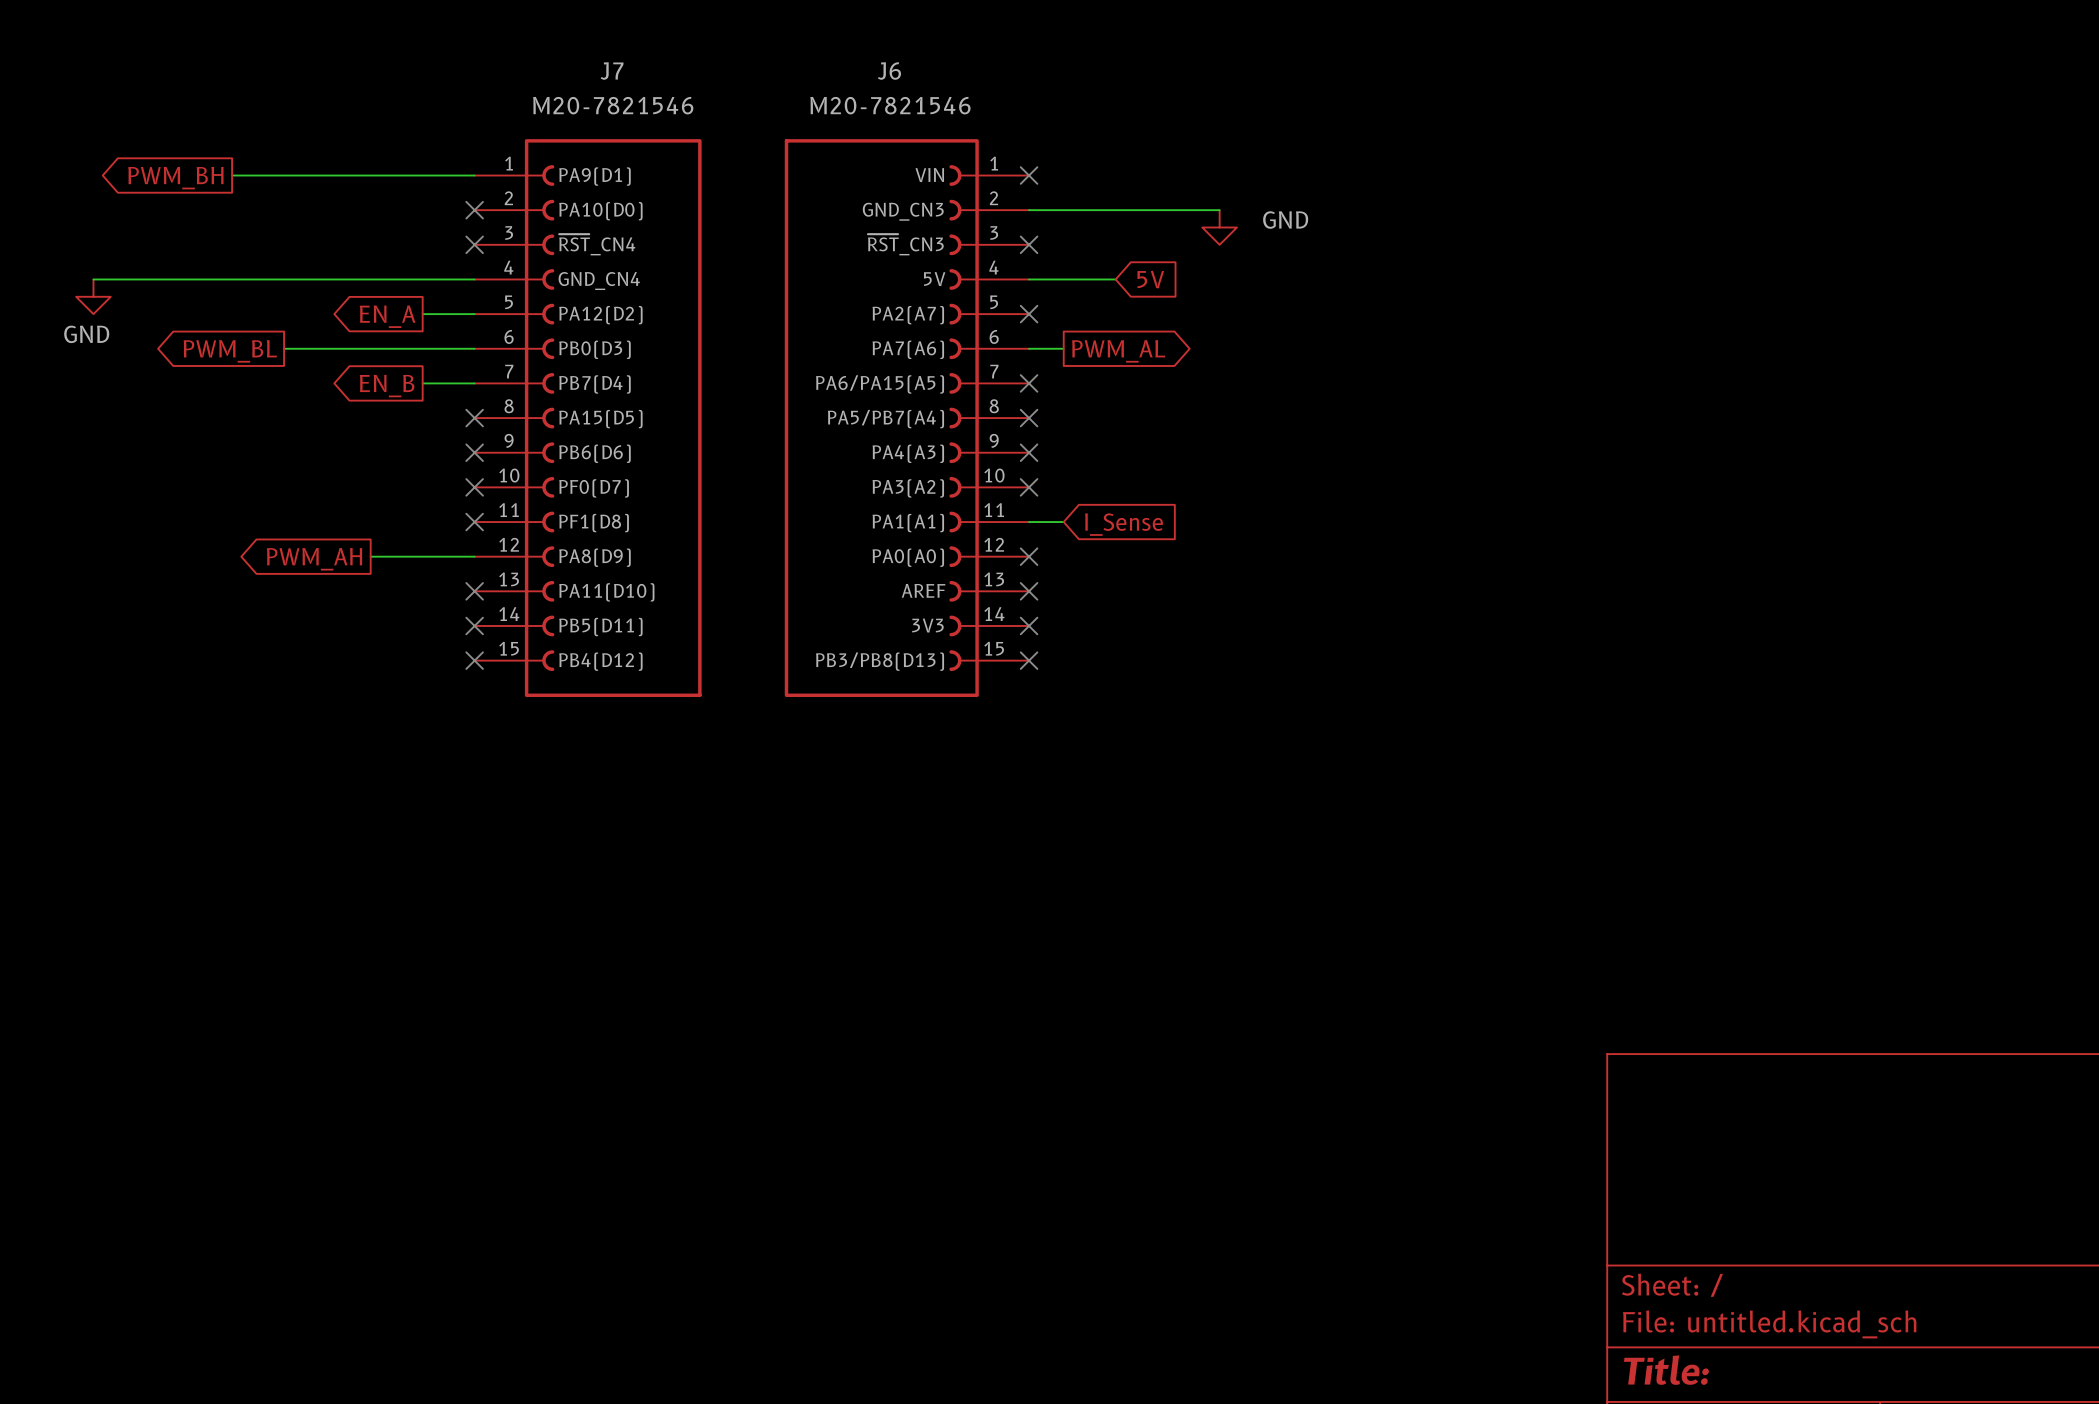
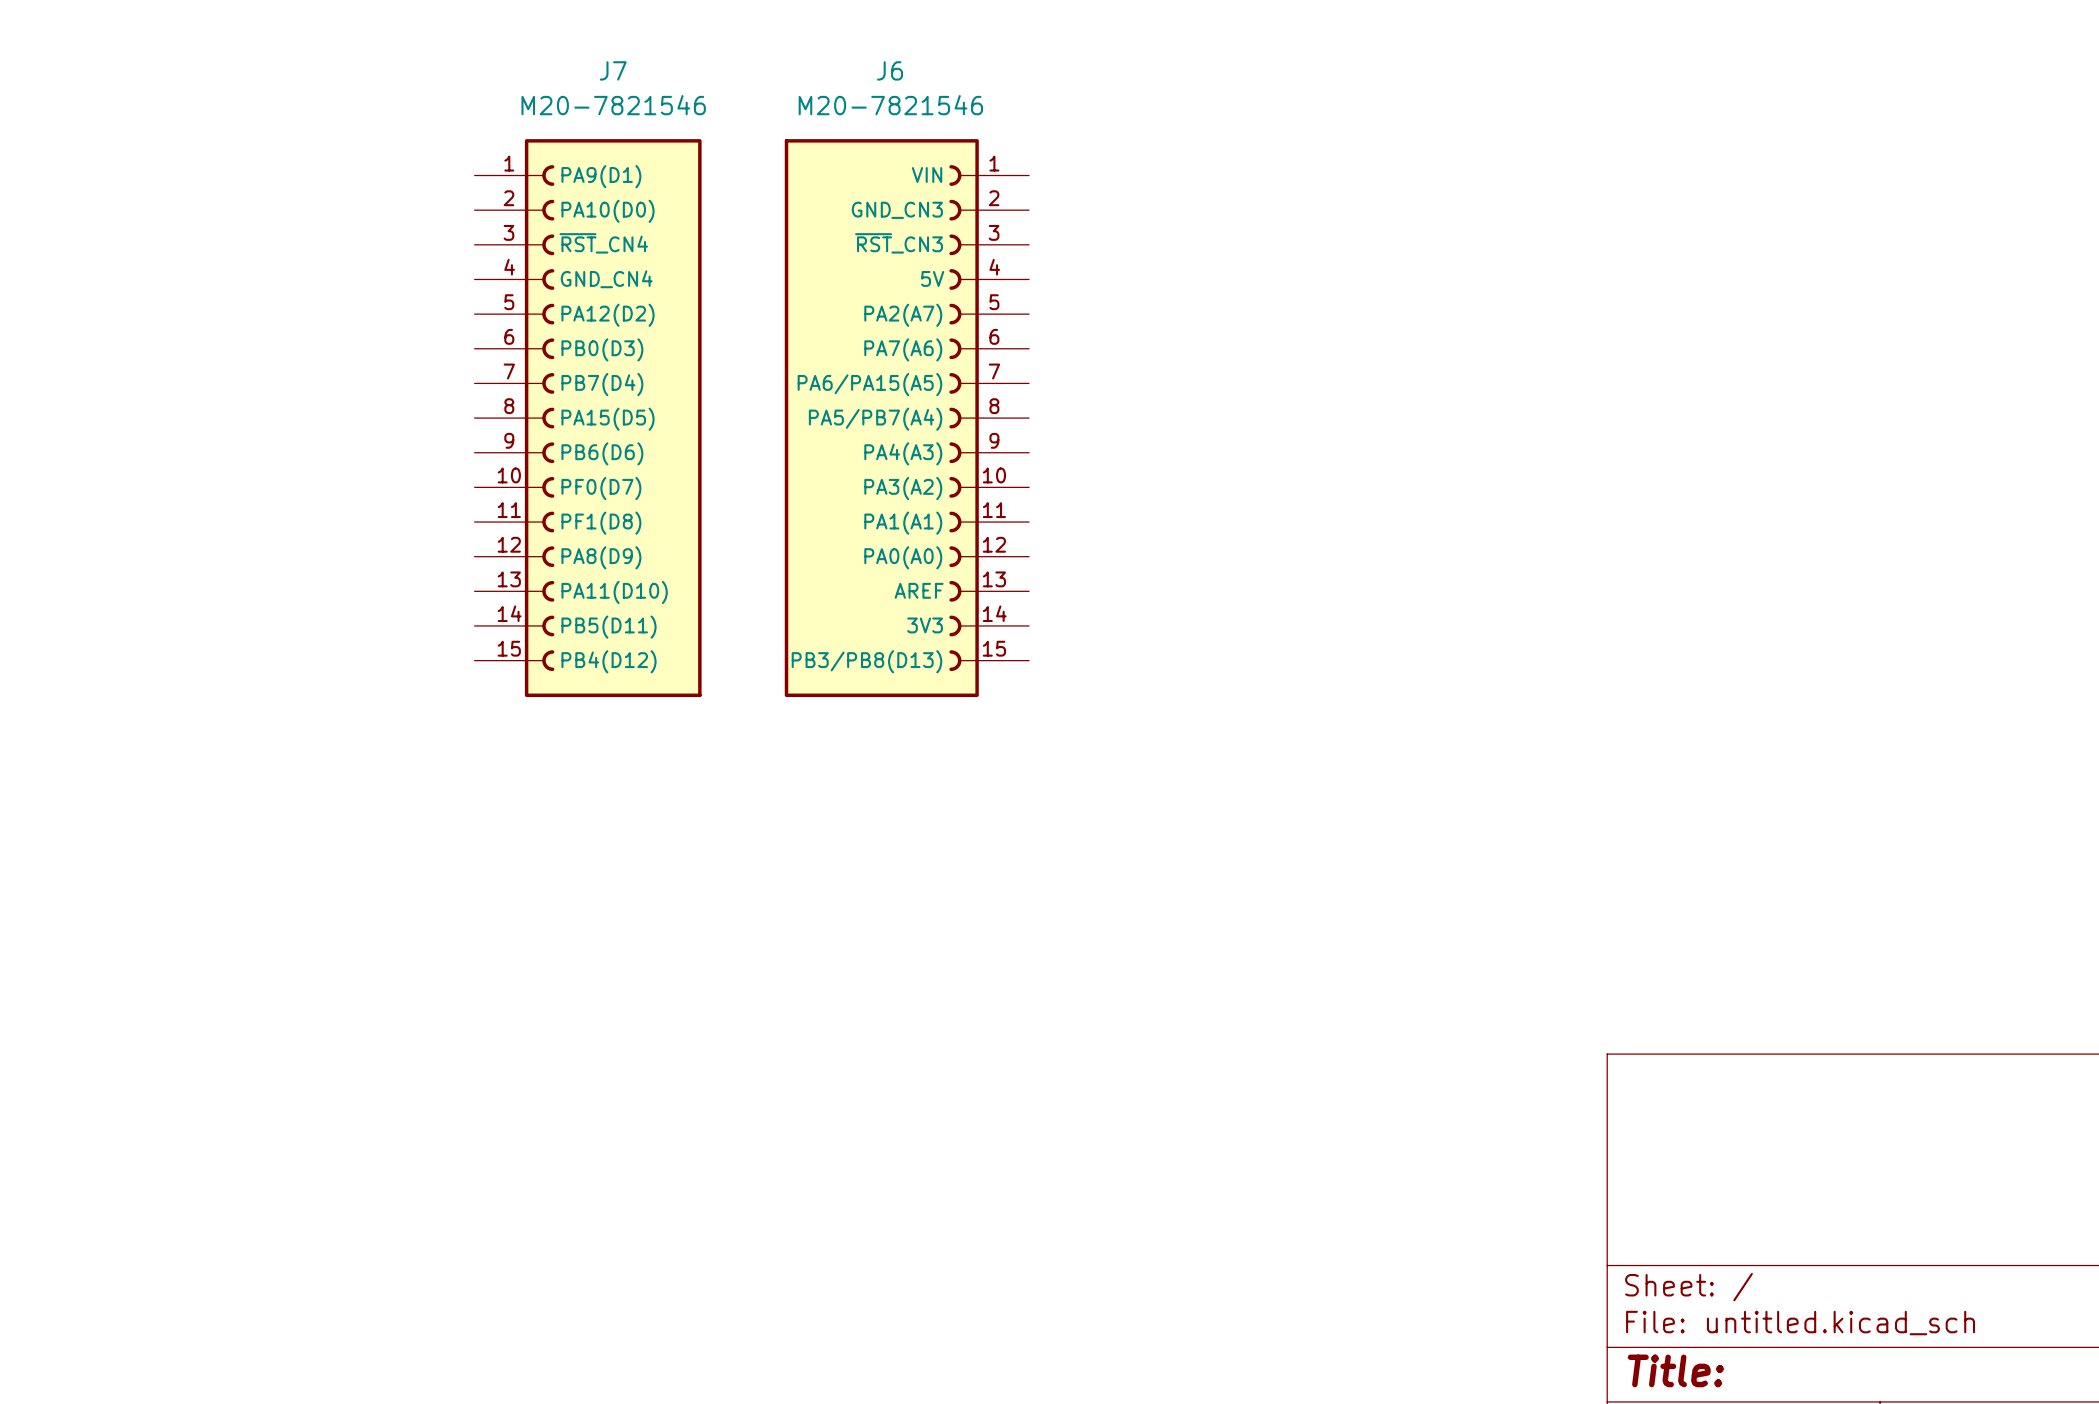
wire: (232, 175) (474, 175) -> none
no-connect mark: (1029, 175) -> none
global label: PWM_BH (175, 178) -> none
no-connect mark: (474, 210) -> none
wire: (1029, 210) (1219, 210) -> none
power symbol: GND (1219, 227) -> none
no-connect mark: (474, 244) -> none
no-connect mark: (1029, 244) -> none
wire: (93, 279) (474, 279) -> none
wire: (1029, 279) (1115, 279) -> none
global label: 5V (1150, 279) -> none
power symbol: GND (93, 296) -> none
wire: (422, 314) (474, 314) -> none
no-connect mark: (1029, 314) -> none
global label: EN_A (387, 316) -> none
wire: (284, 348) (474, 348) -> none
wire: (1029, 348) (1063, 348) -> none
global label: PWM_BL (230, 351) -> none
global label: PWM_AL (1118, 351) -> none
wire: (422, 383) (474, 383) -> none
no-connect mark: (1029, 383) -> none
global label: EN_B (387, 386) -> none
no-connect mark: (474, 418) -> none
no-connect mark: (1029, 418) -> none
no-connect mark: (474, 452) -> none
no-connect mark: (1029, 452) -> none
no-connect mark: (474, 487) -> none
no-connect mark: (1029, 487) -> none
no-connect mark: (474, 522) -> none
wire: (1029, 522) (1063, 522) -> none
global label: I_Sense (1123, 524) -> none
wire: (370, 556) (474, 556) -> none
no-connect mark: (1029, 556) -> none
global label: PWM_AH (314, 559) -> none
no-connect mark: (474, 591) -> none
no-connect mark: (1029, 591) -> none
no-connect mark: (474, 625) -> none
no-connect mark: (1029, 625) -> none
no-connect mark: (474, 660) -> none
no-connect mark: (1029, 660) -> none

